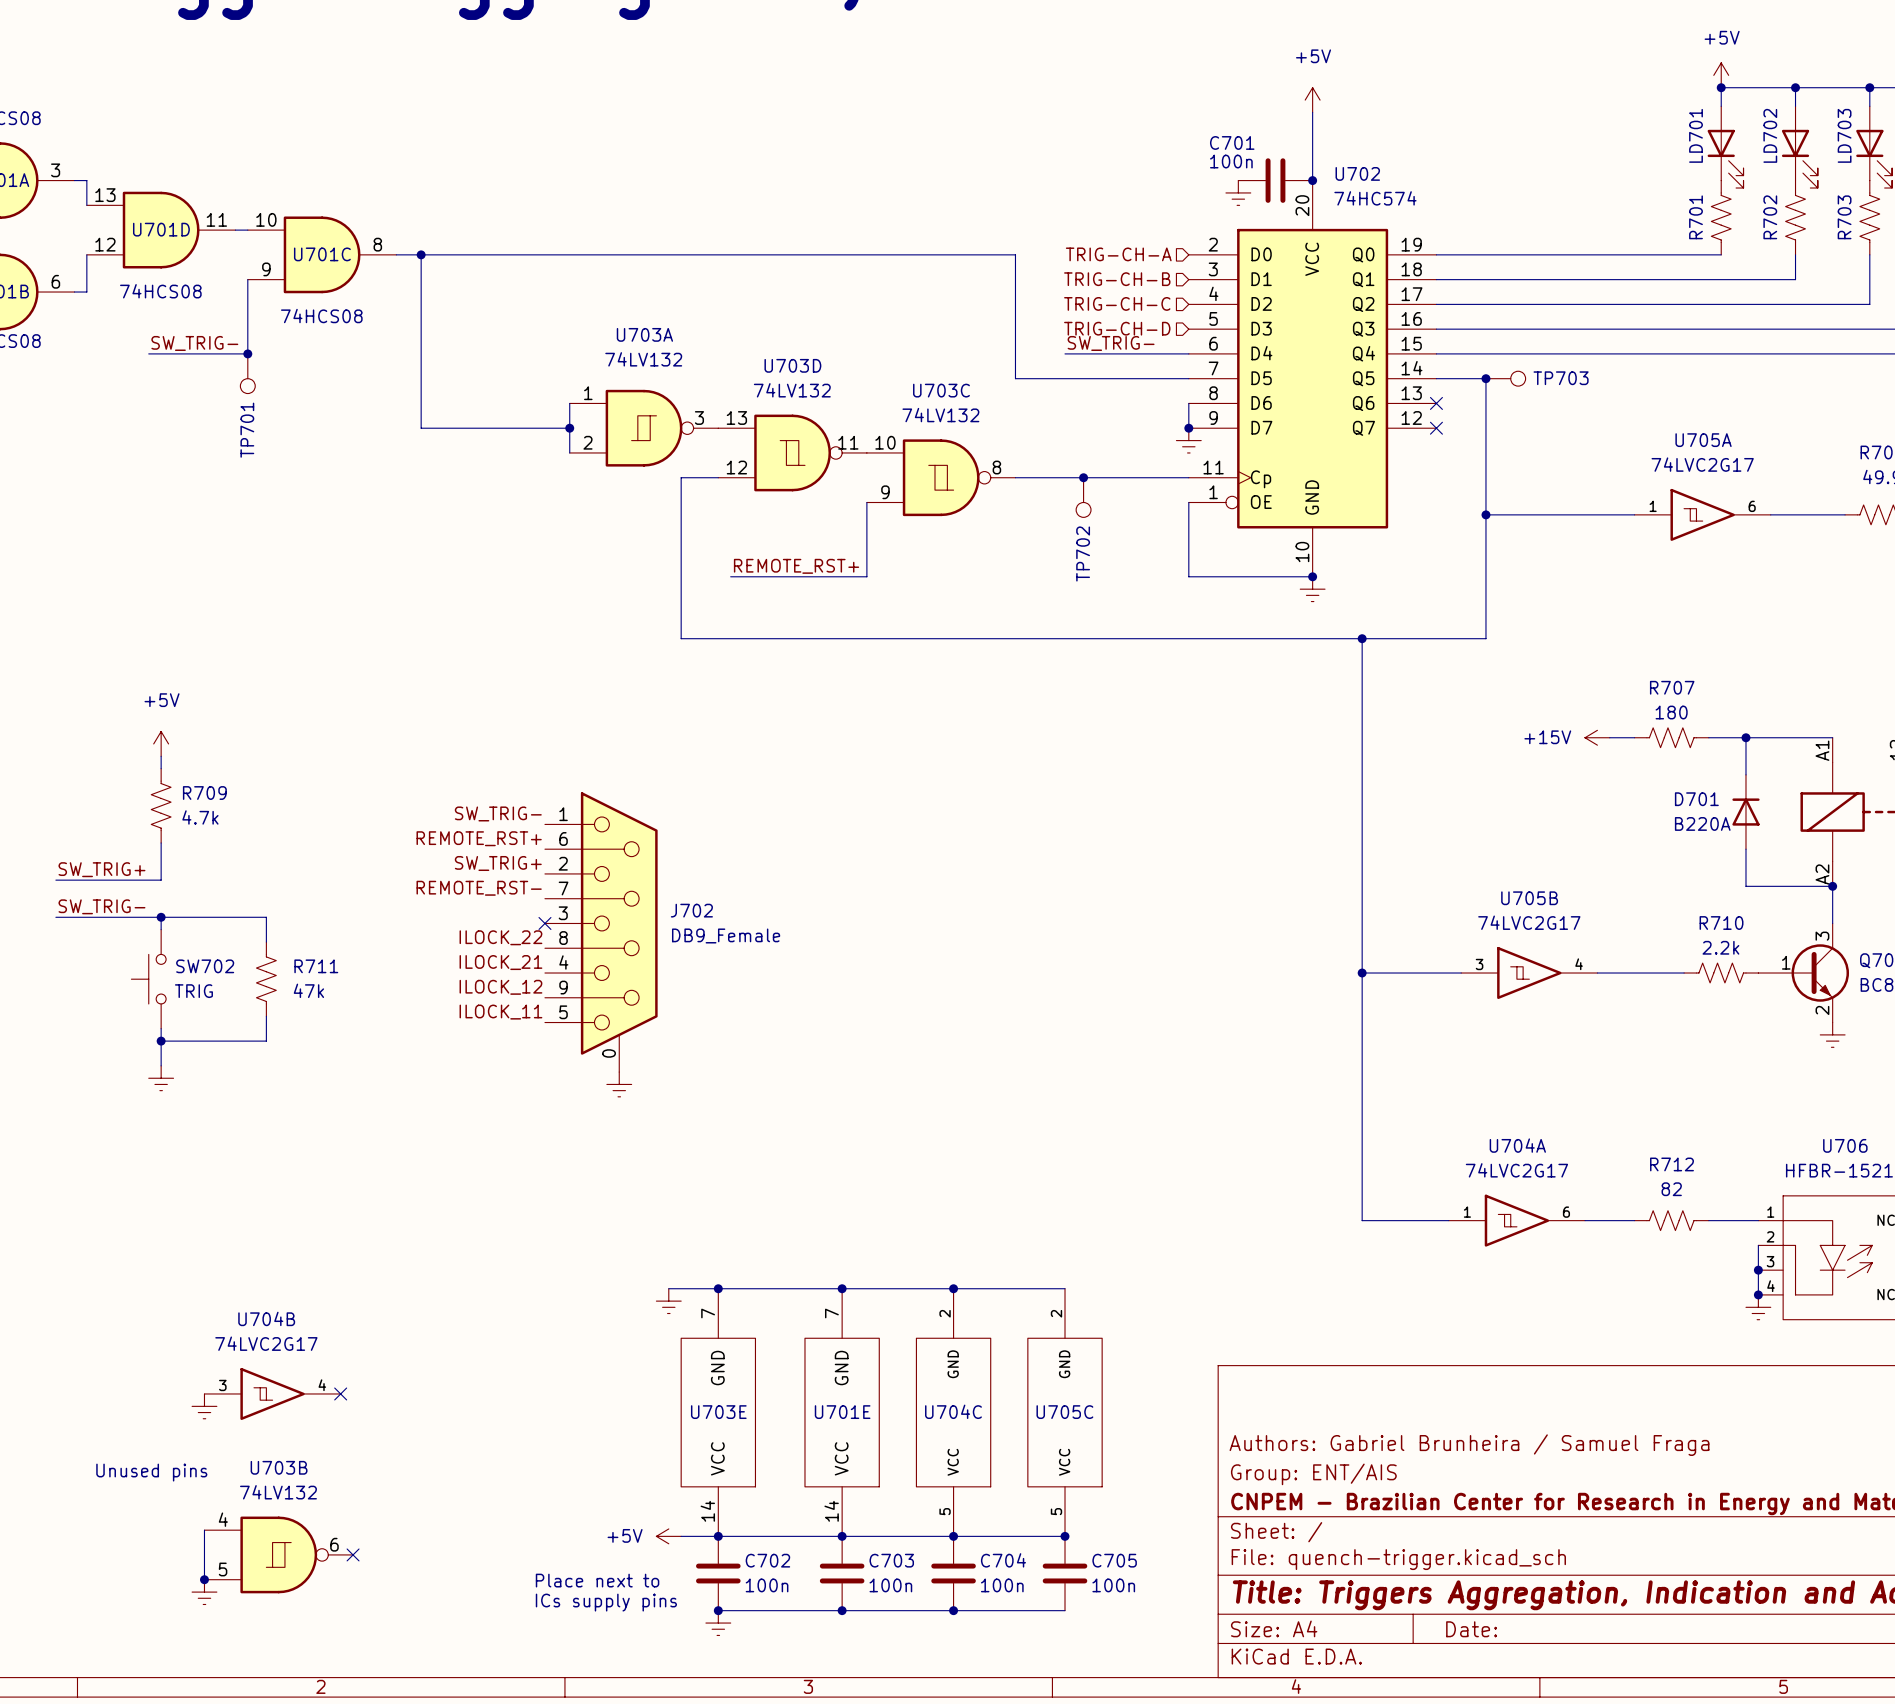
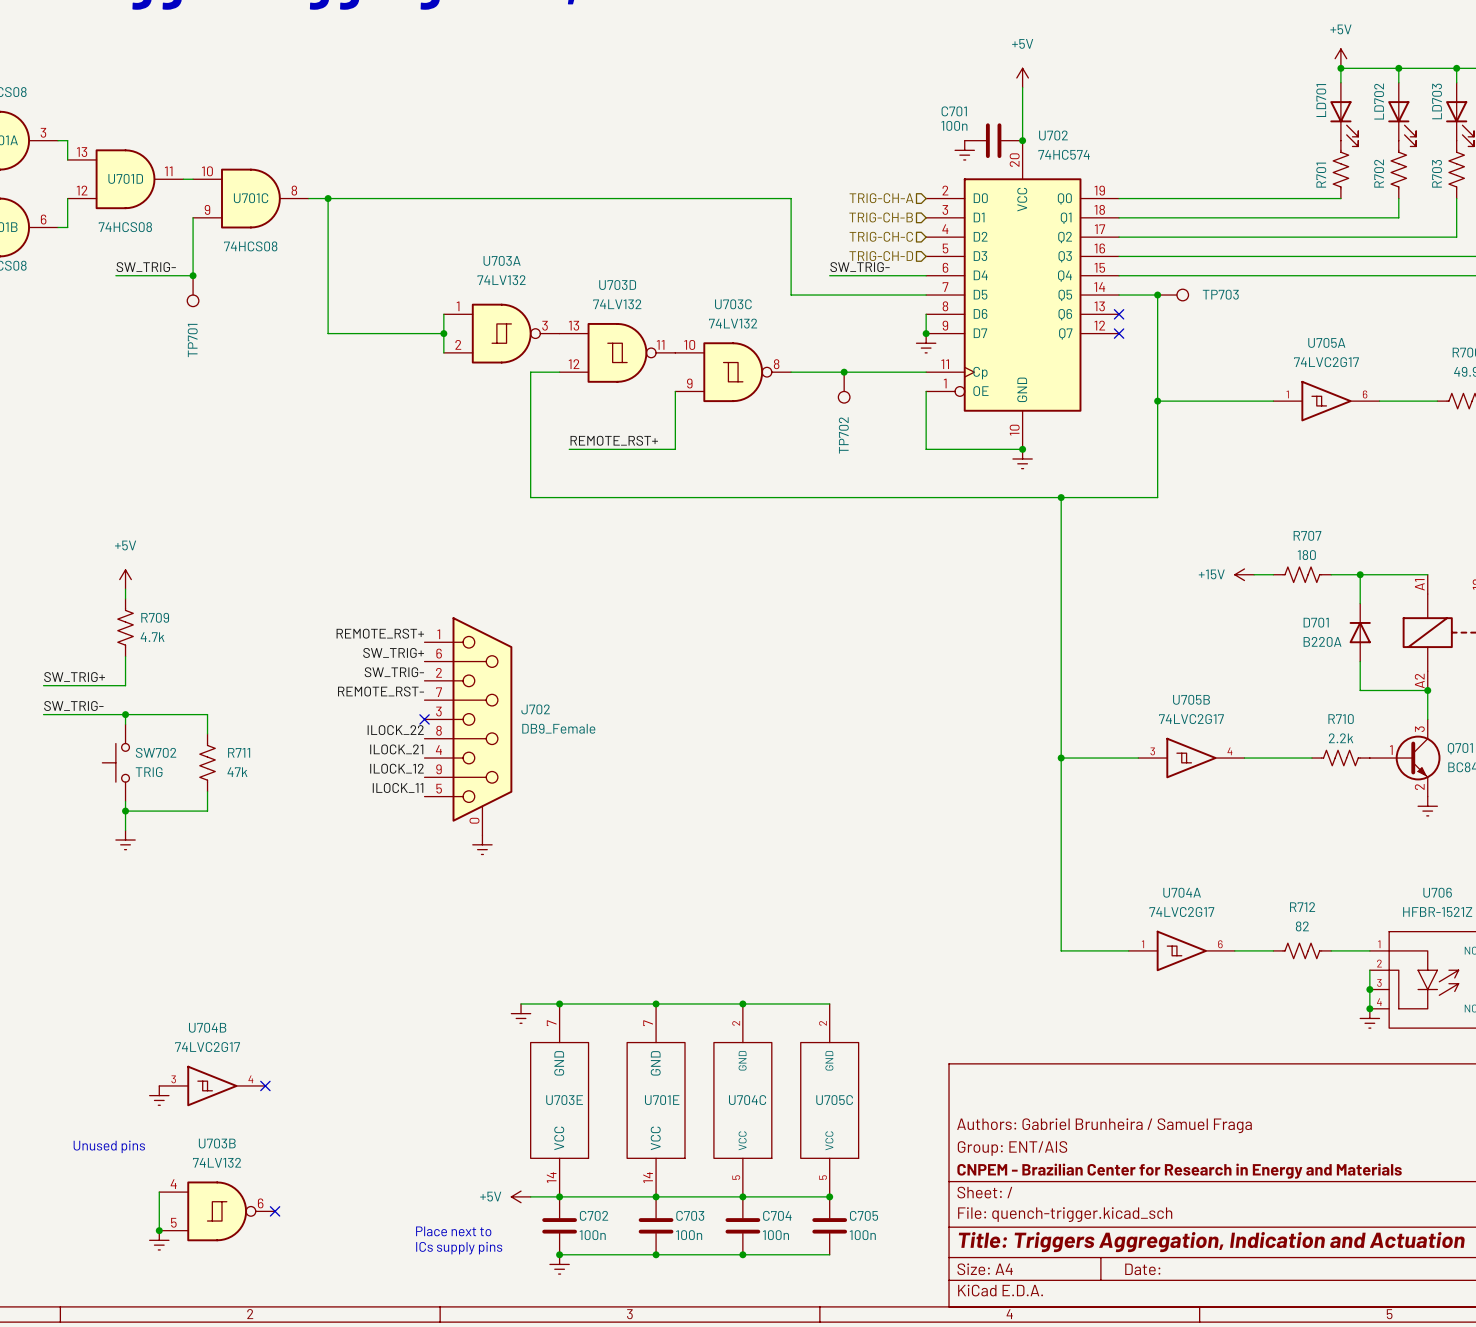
label: SW_TRIG- (498, 813) -> REMOTE_RST+ (380, 633)
label: REMOTE_RST+ (479, 838) -> SW_TRIG+ (393, 652)
label: SW_TRIG+ (498, 863) -> SW_TRIG- (394, 672)

